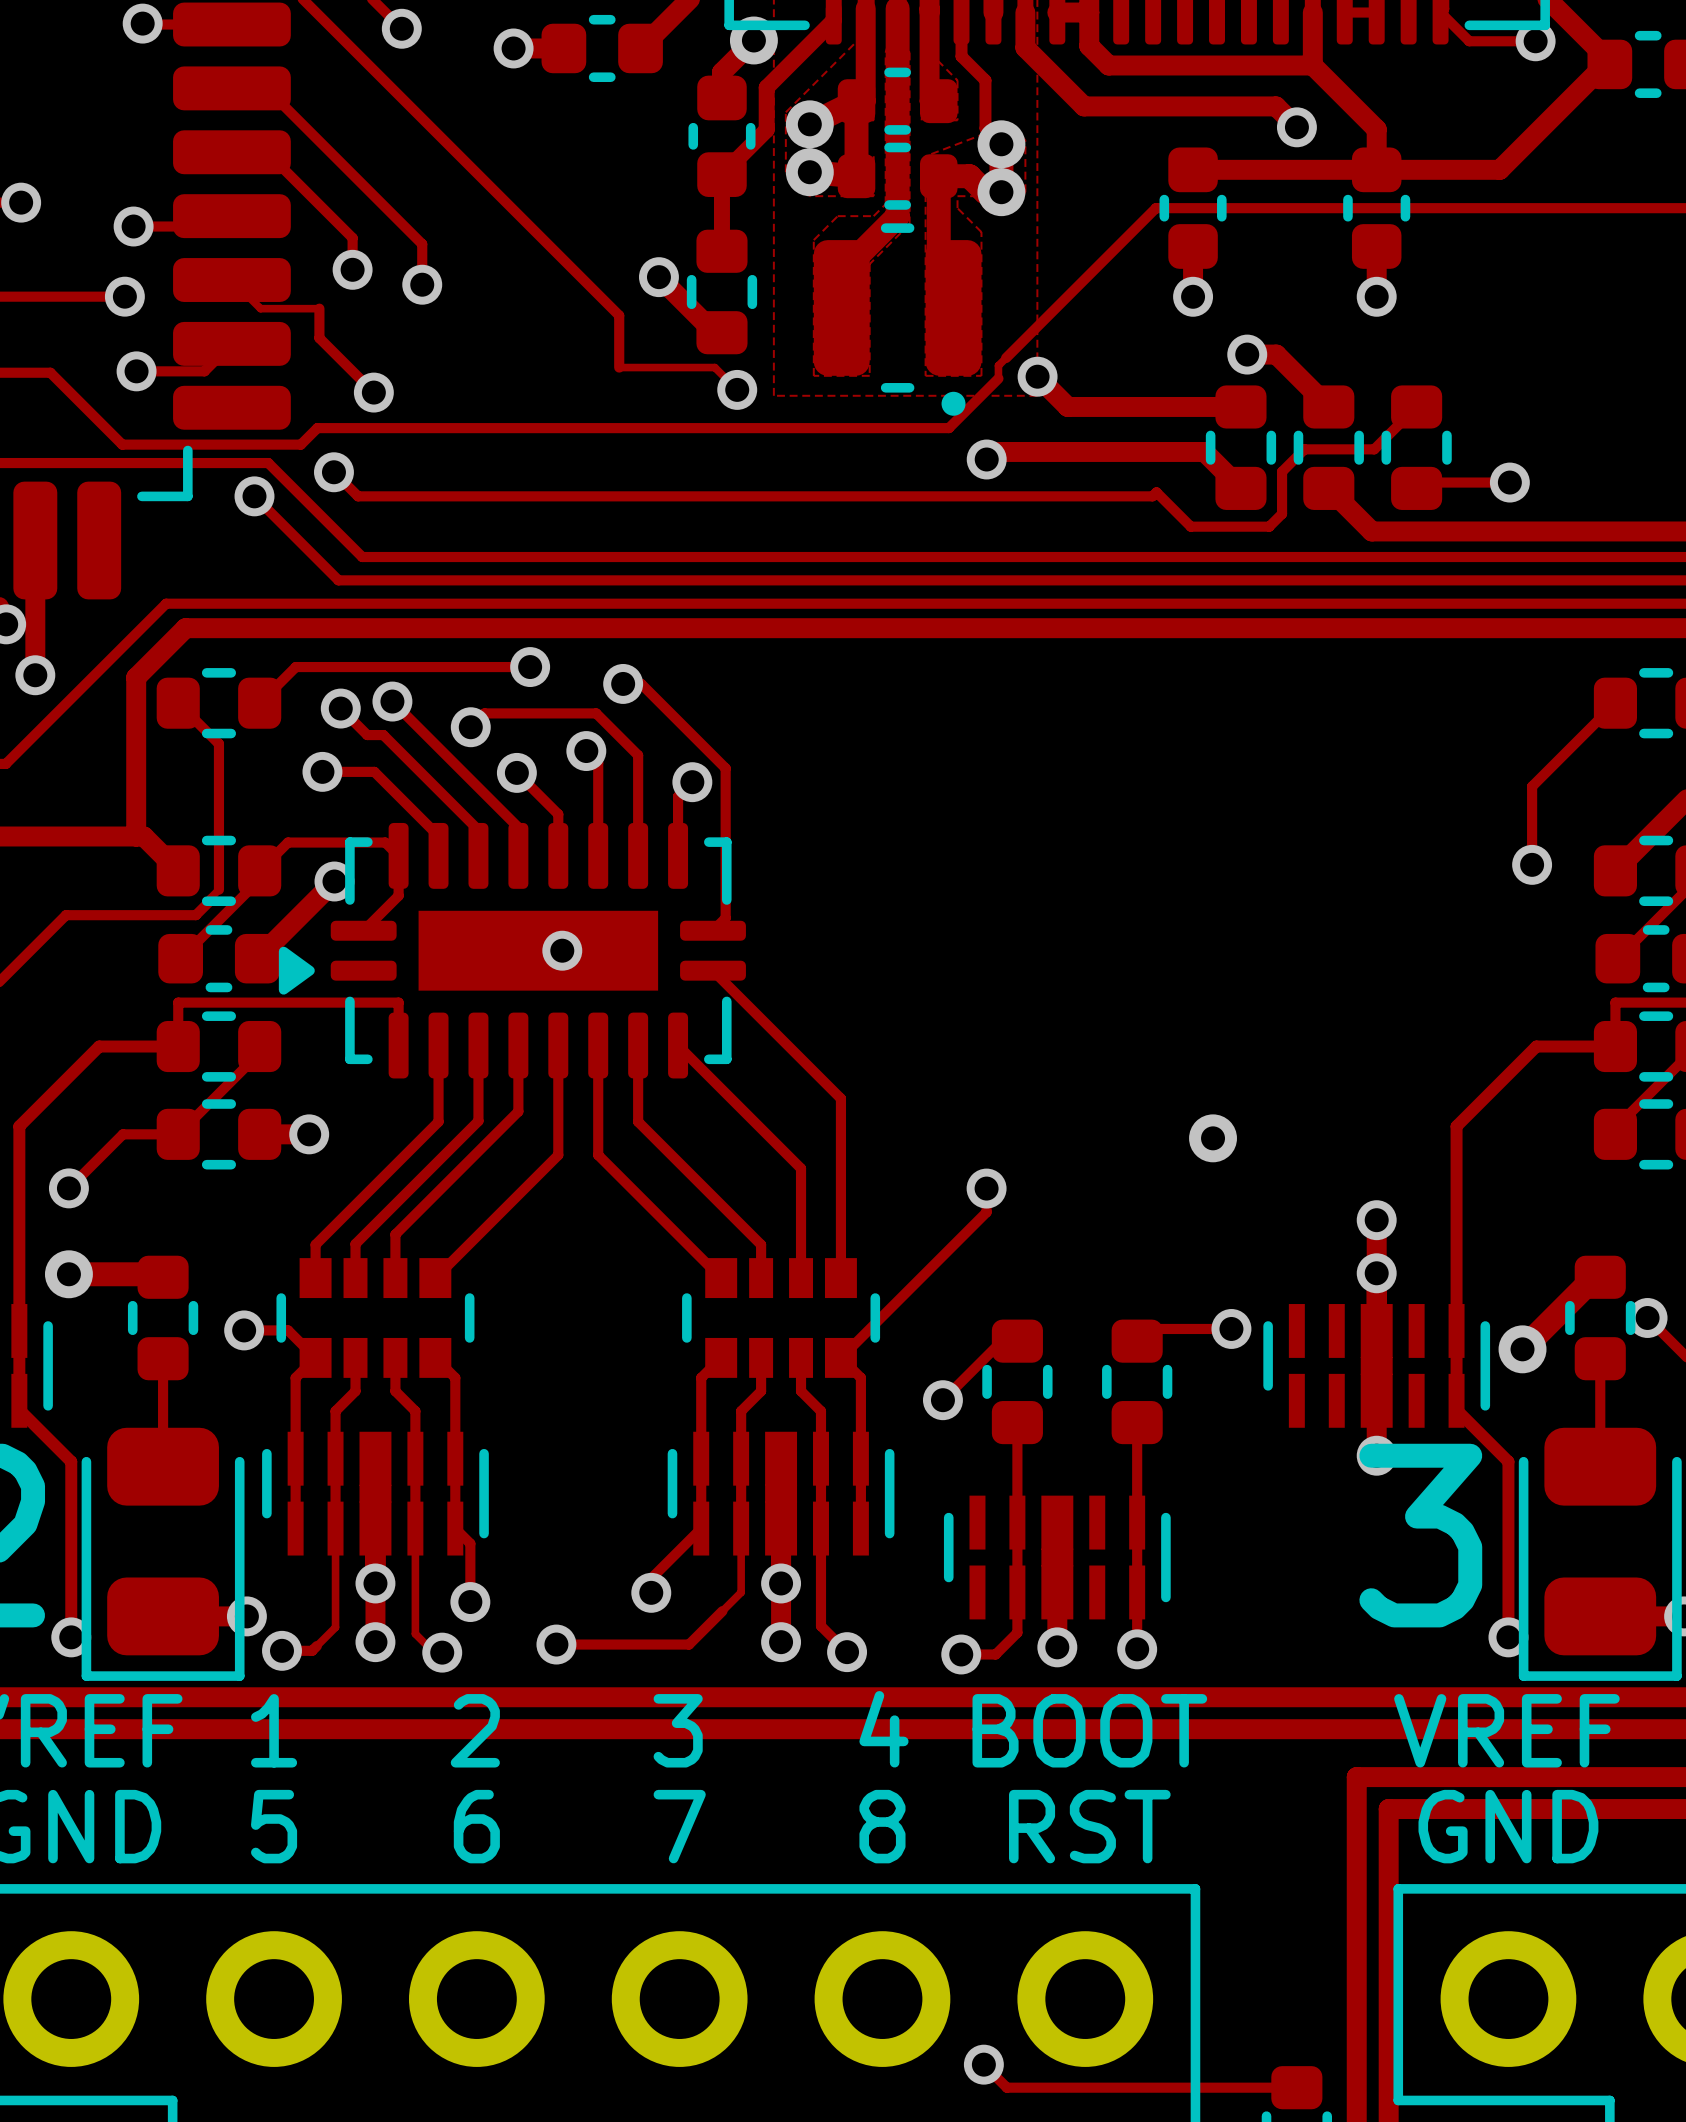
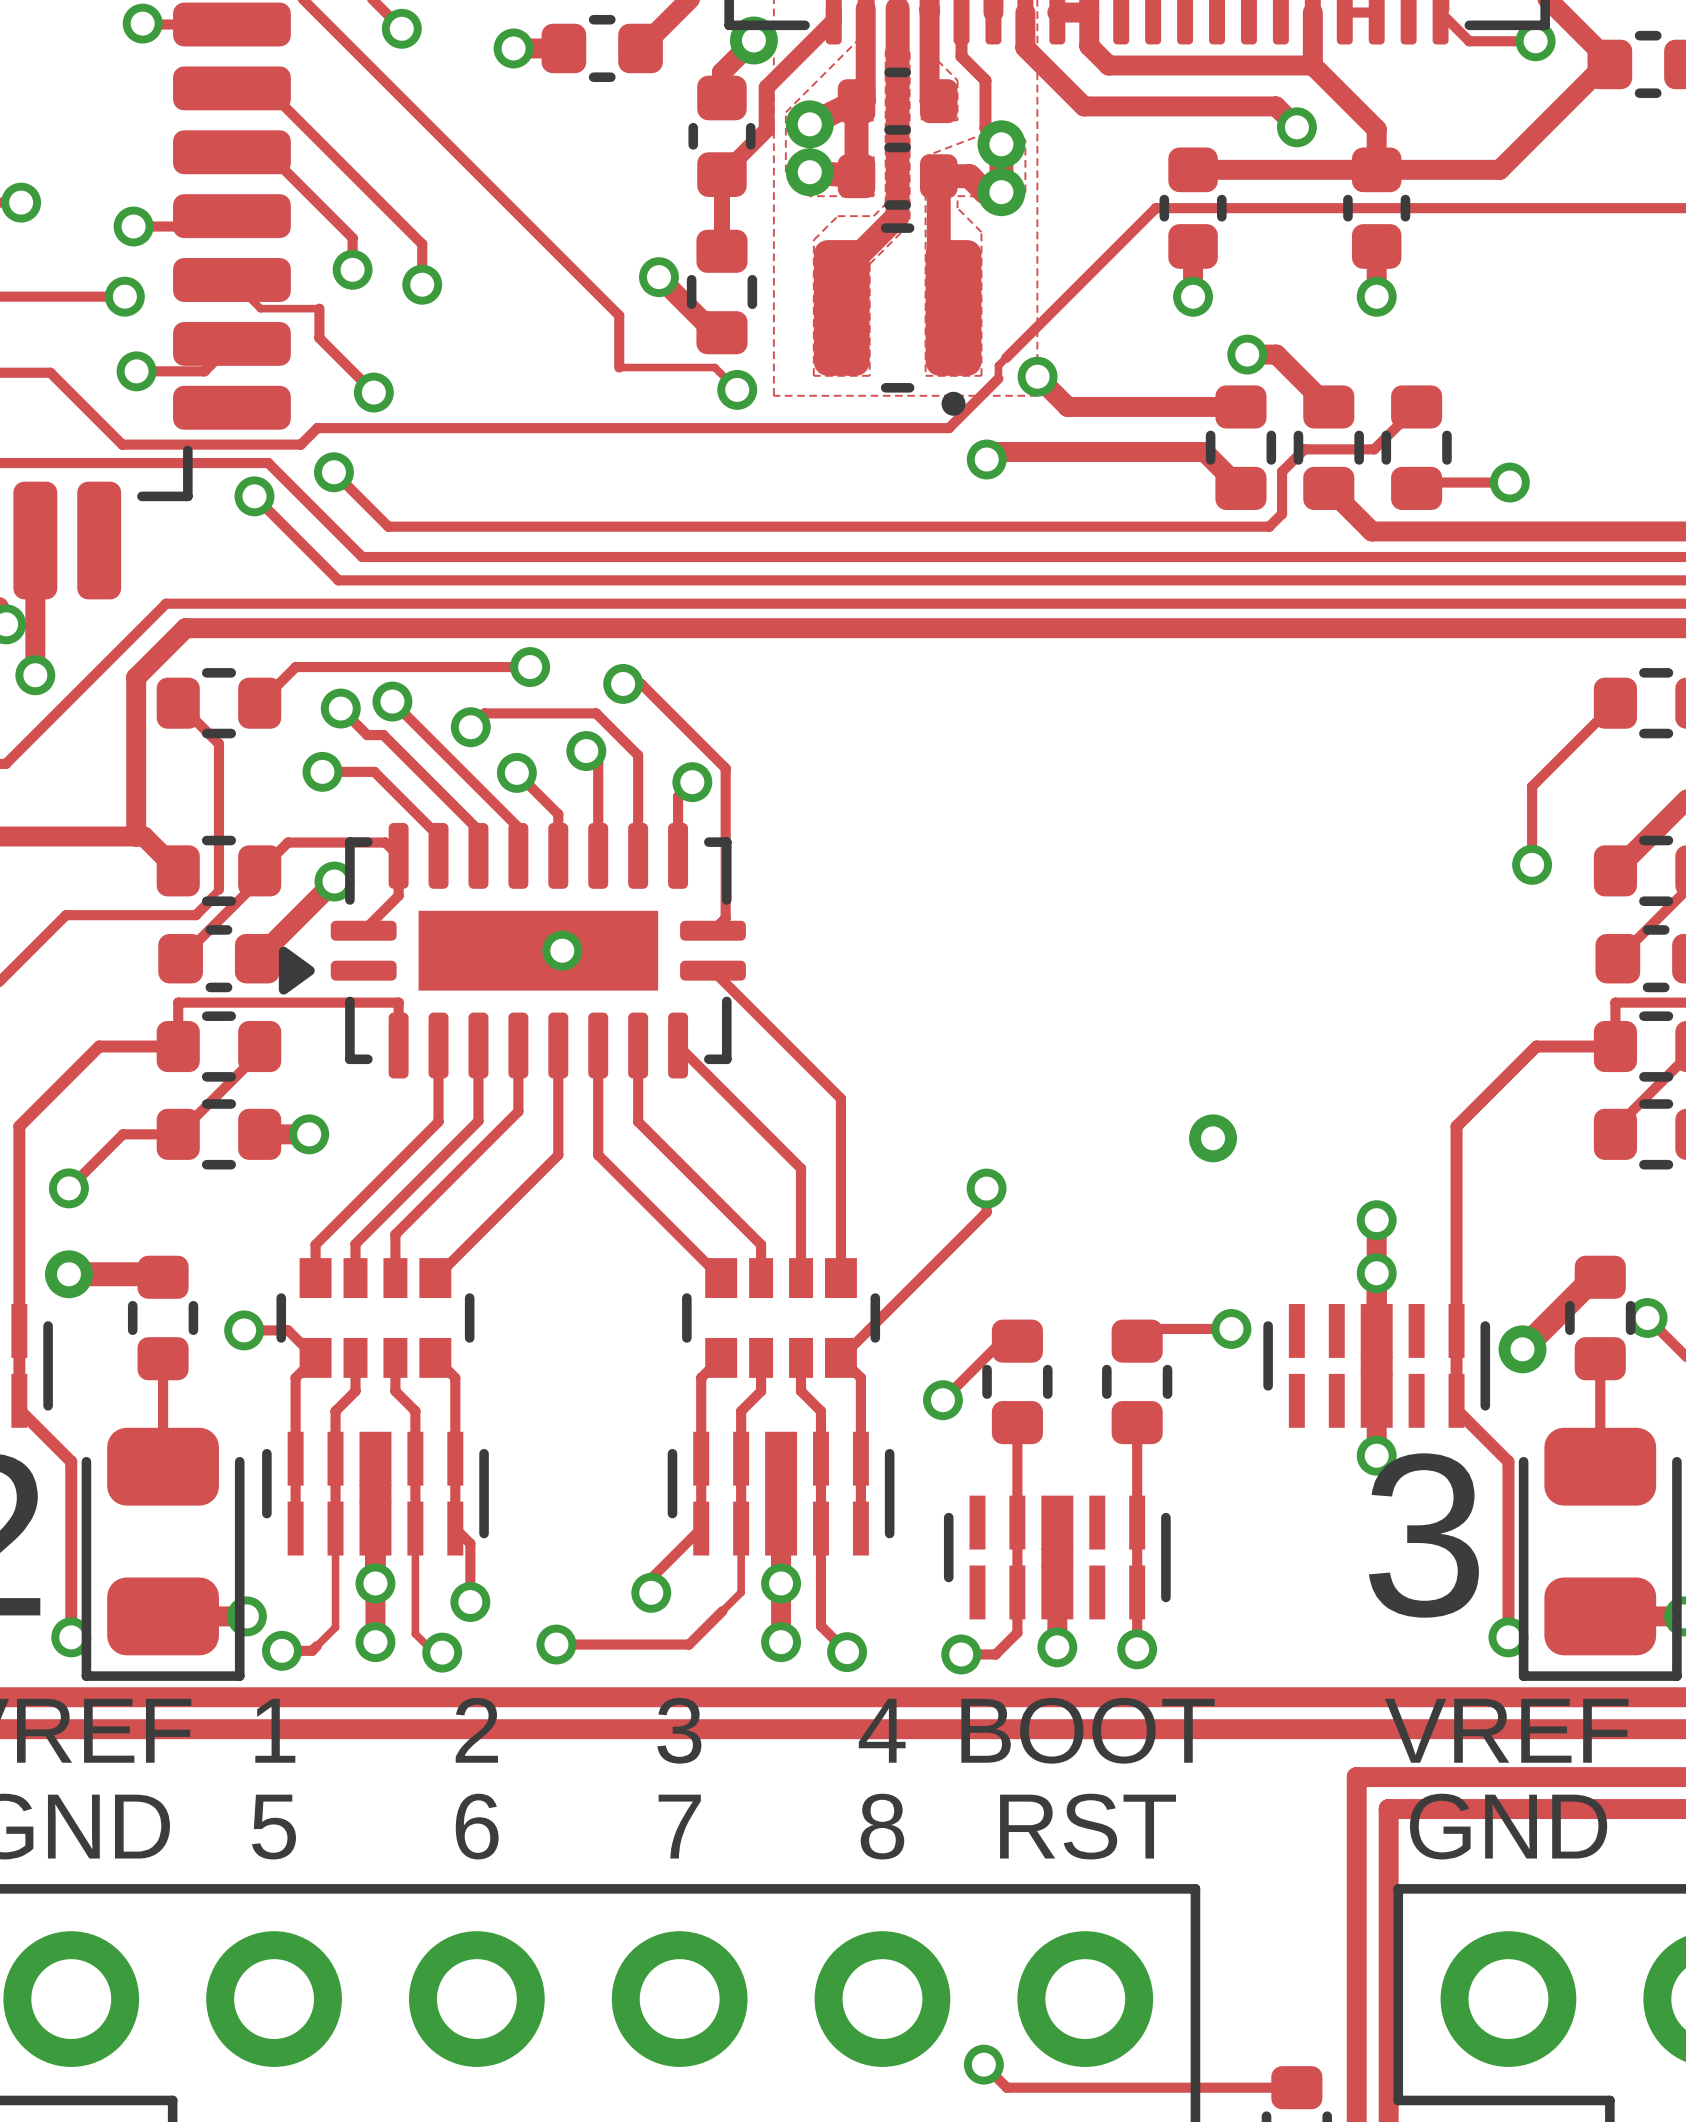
track: (358, 496) (1152, 496) (1156, 492) (1190, 526) -> (358, 496) (388, 526) (1190, 526)

